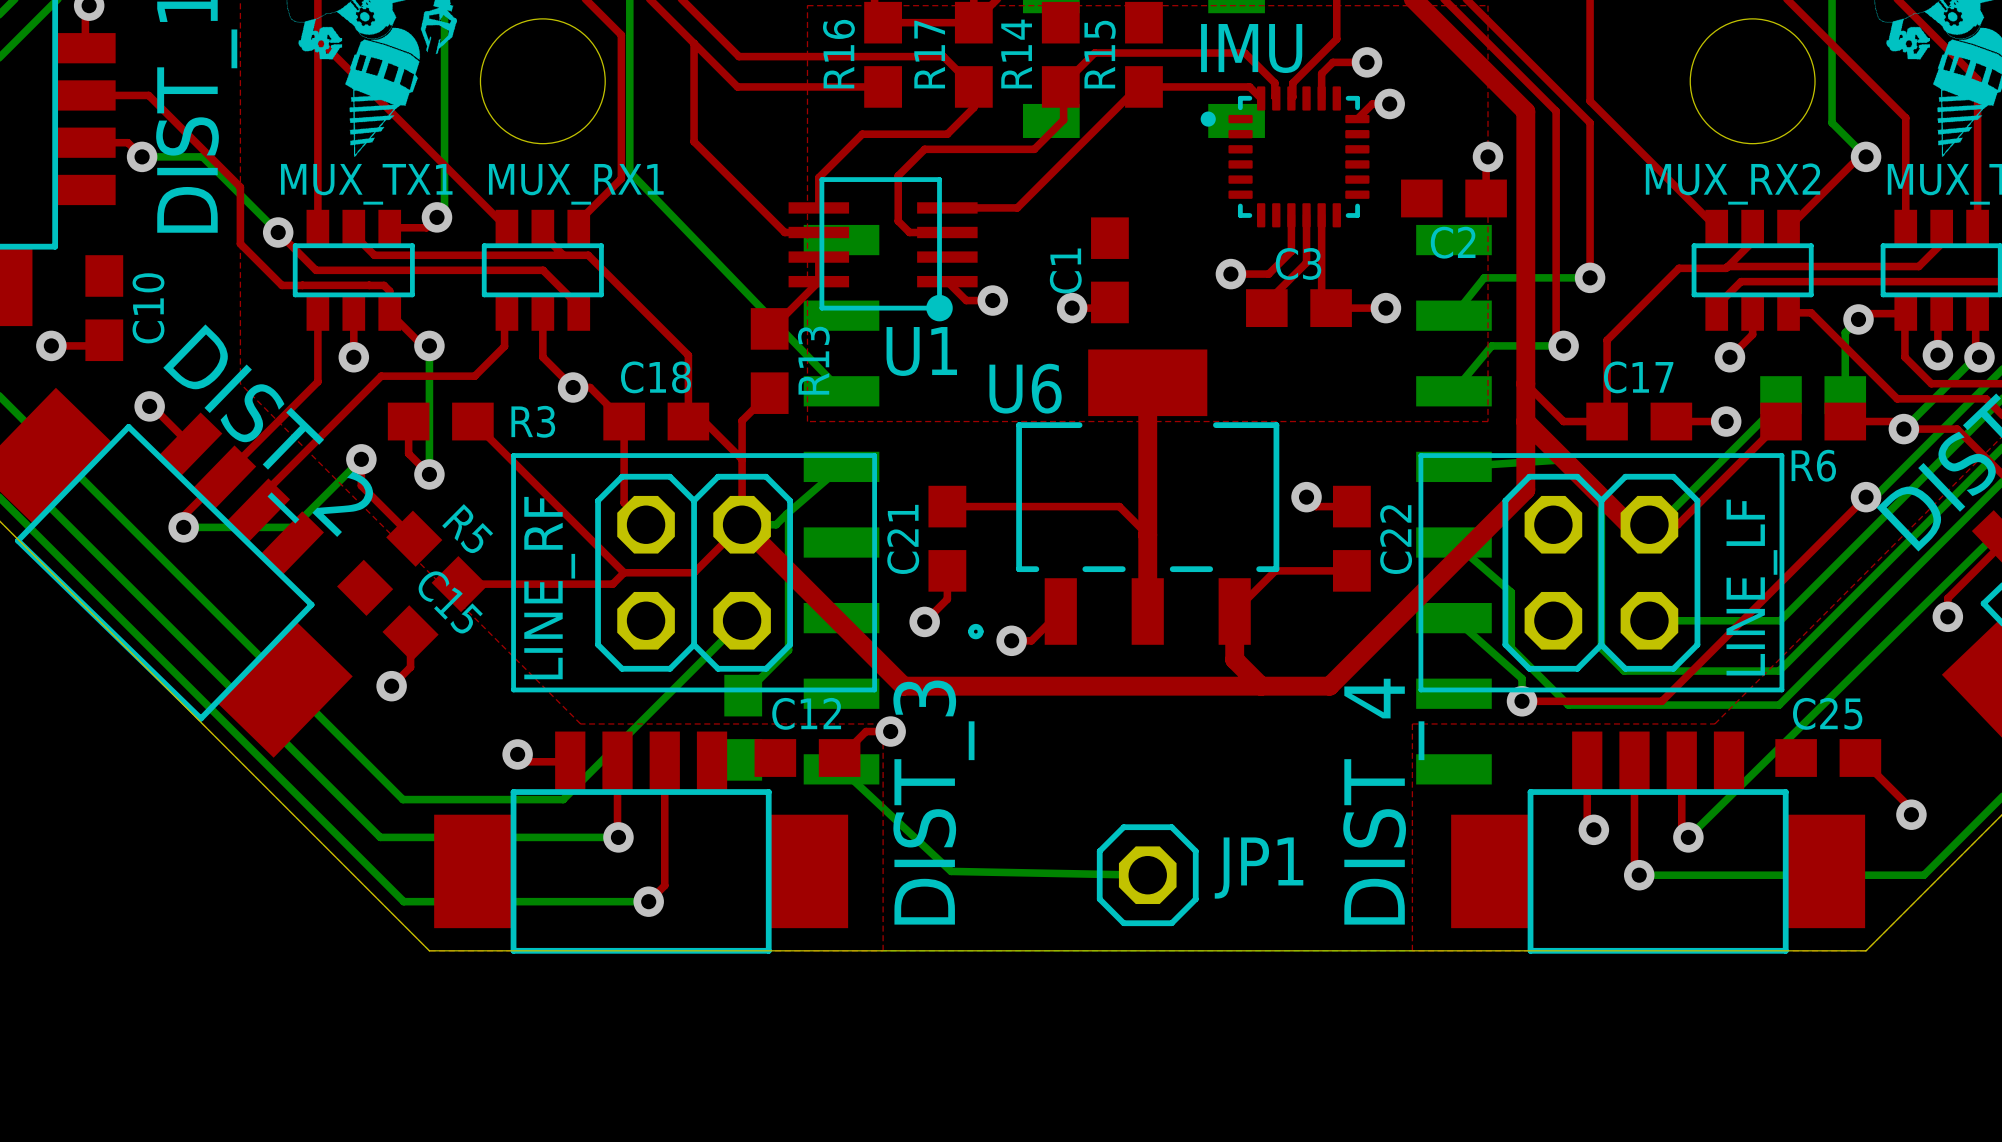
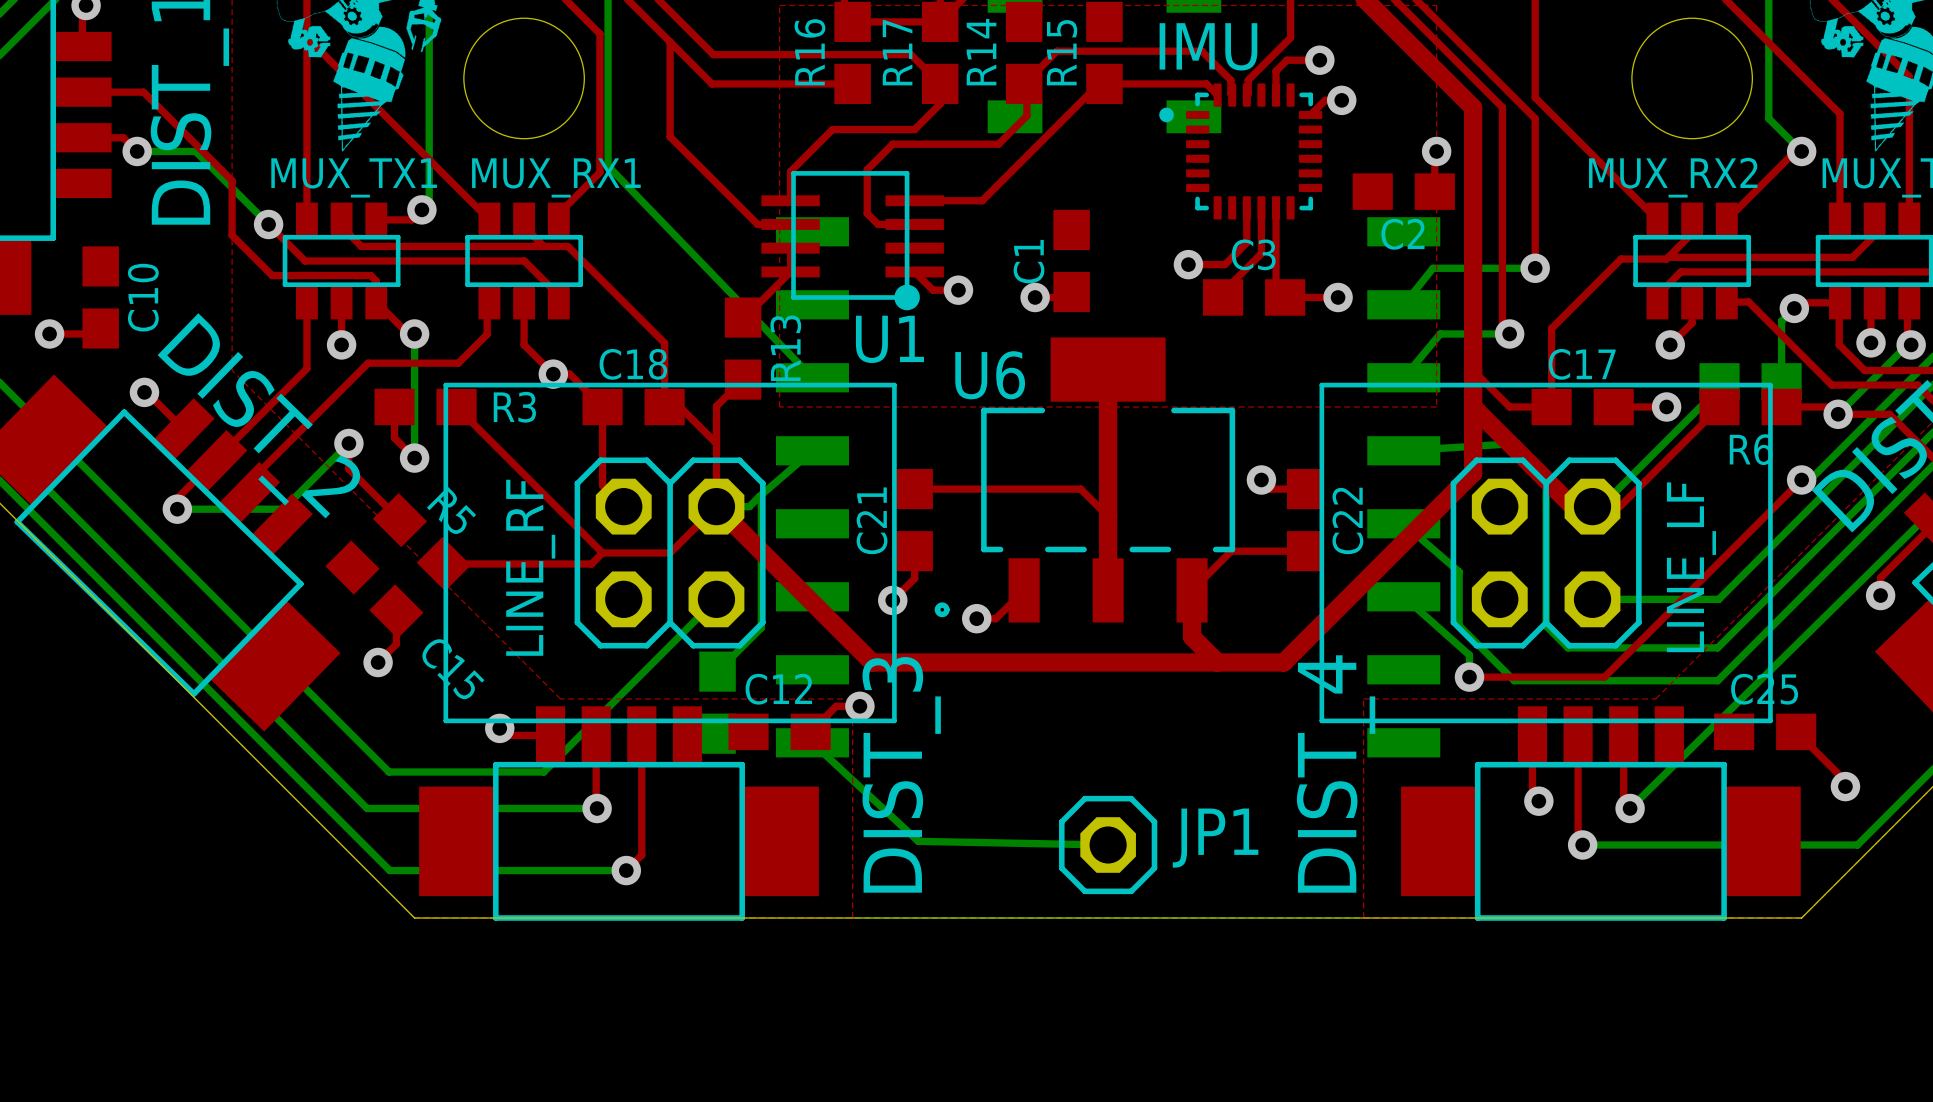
LINE_RF footprint: [511, 453, 877, 693] -> [443, 382, 897, 724]
LINE_LF footprint: [1418, 453, 1785, 693] -> [1319, 382, 1773, 724]
C15 name position: C15 (450, 602) -> C15 (453, 669)

